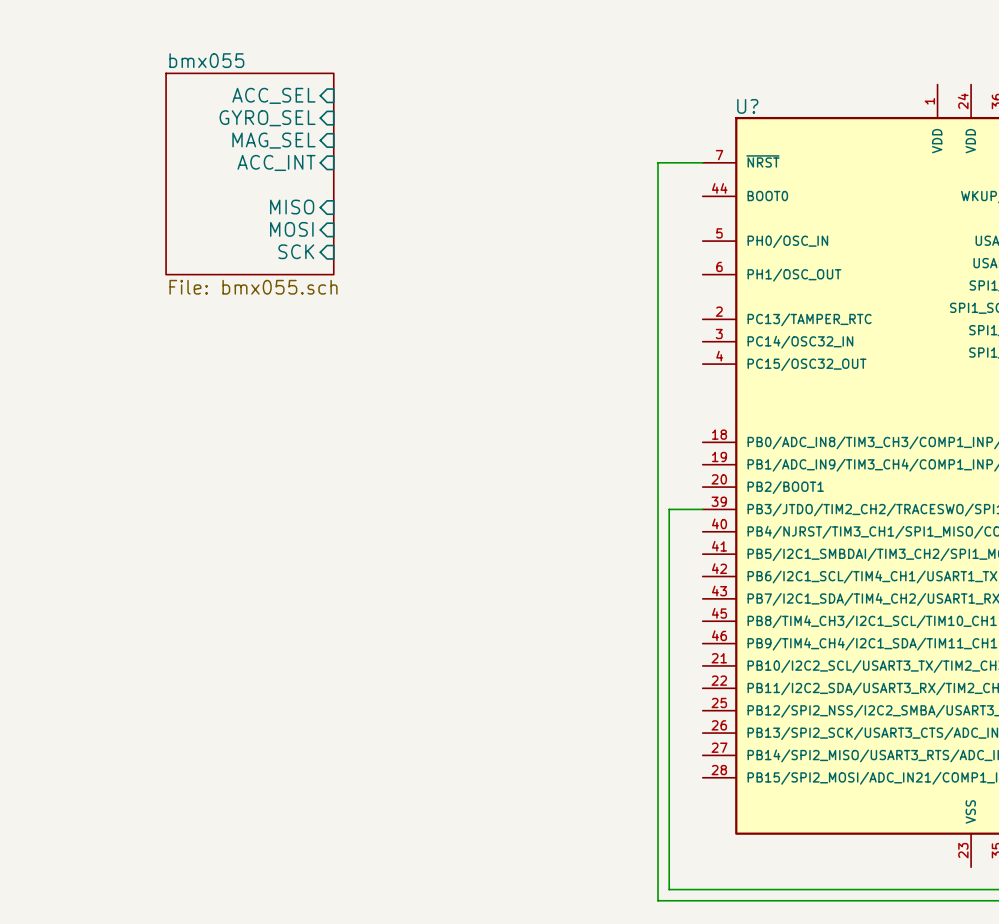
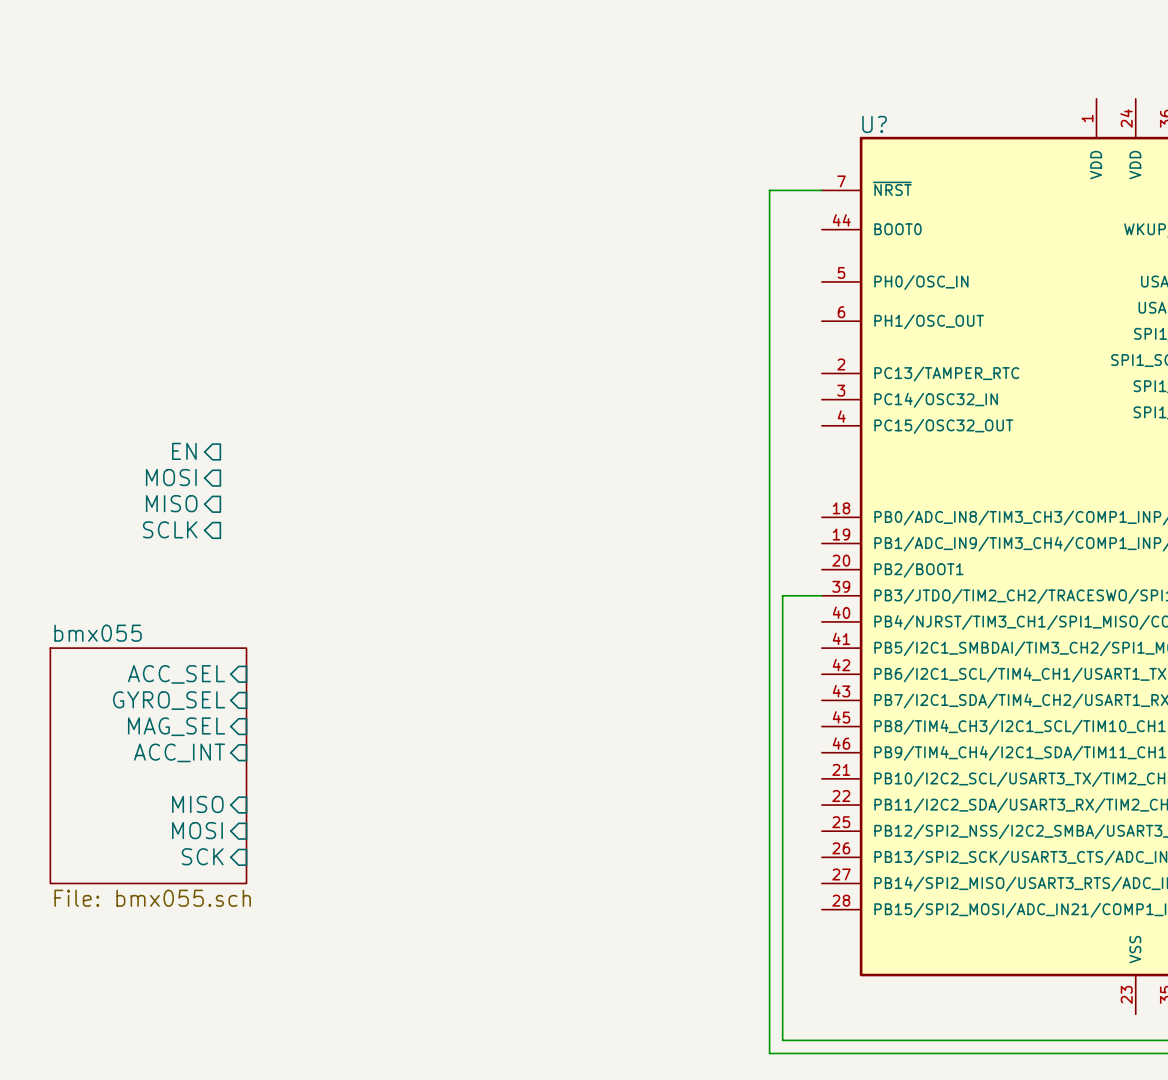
sheet pin: ACC_SEL (273, 95) -> none
sheet pin: GYRO_SEL (267, 118) -> none
sheet pin: MAG_SEL (273, 140) -> none
sheet pin: ACC_INT (276, 162) -> none
sheet bmx055 position: (249, 173) -> (148, 765)
sheet pin: MISO (292, 207) -> none
sheet pin: MOSI (291, 229) -> none
sheet pin: SCK (296, 251) -> none
sheet pin: none -> EN (184, 451)
sheet pin: none -> MOSI (171, 477)
sheet pin: none -> MISO (171, 503)
sheet pin: none -> SCLK (170, 529)
sheet pin: none -> ACC_SEL (176, 674)
sheet pin: none -> GYRO_SEL (169, 700)
sheet pin: none -> MAG_SEL (176, 726)
sheet pin: none -> ACC_INT (179, 752)
sheet pin: none -> MISO (197, 804)
sheet pin: none -> MOSI (197, 830)
sheet pin: none -> SCK (202, 856)

